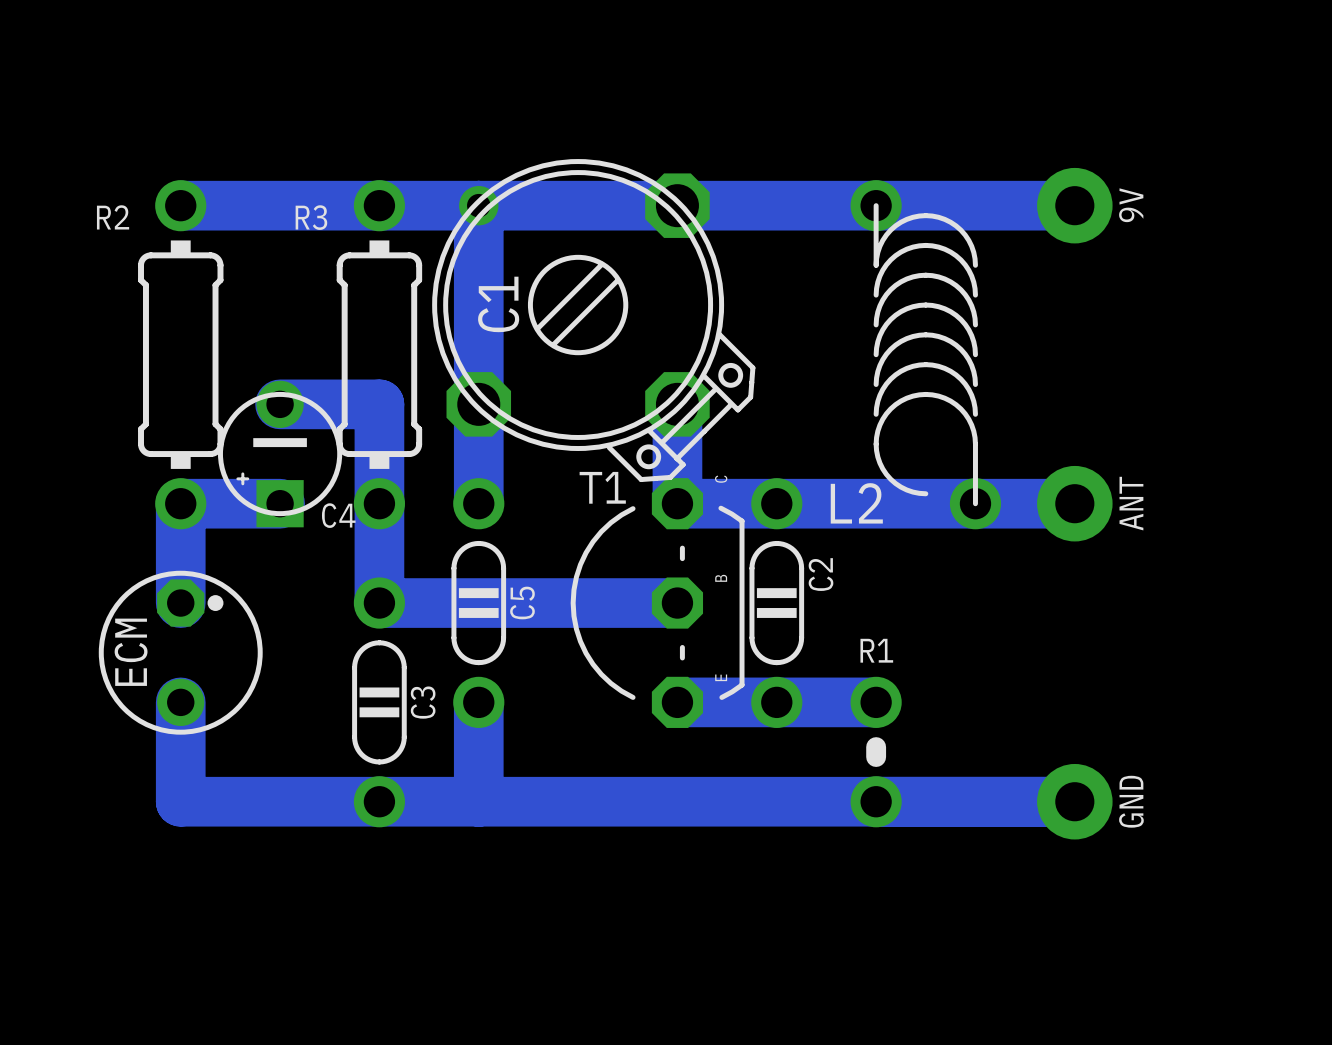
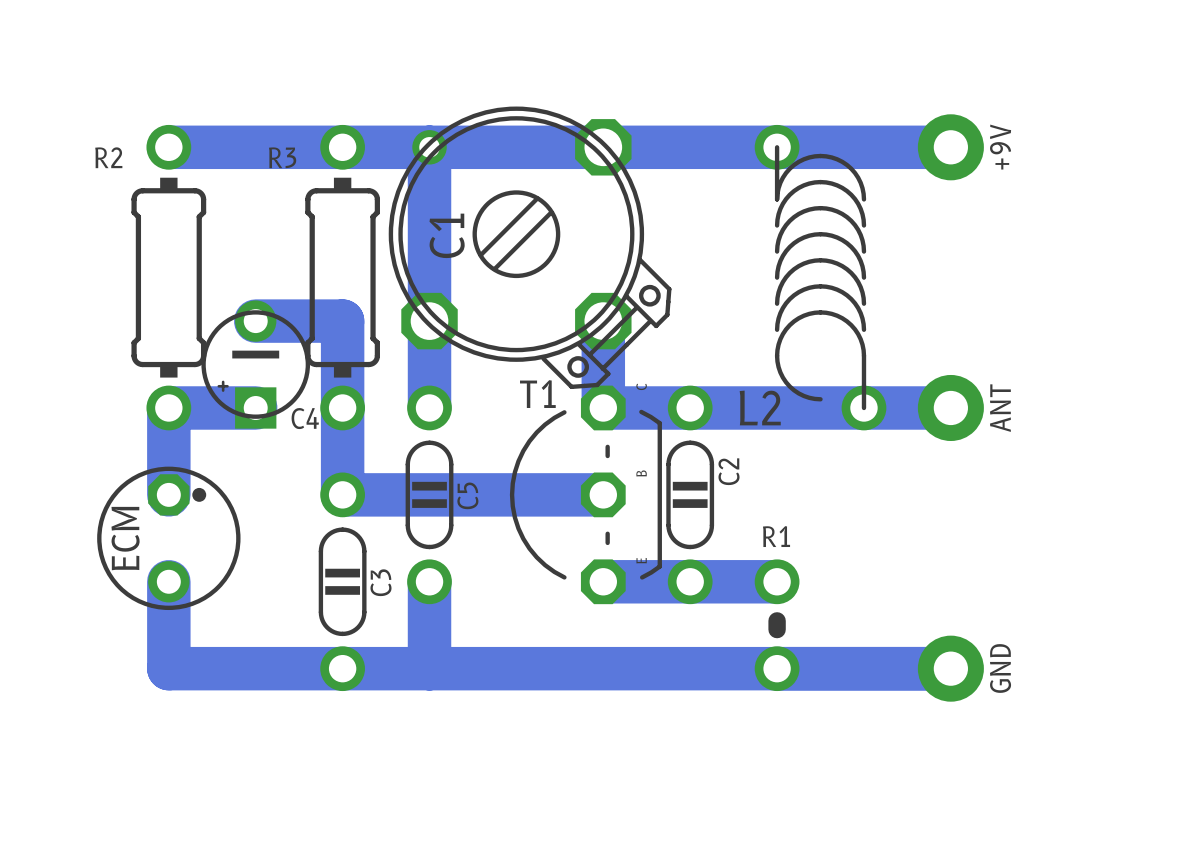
9V name: 9V (1131, 205) -> +9V (1000, 147)

